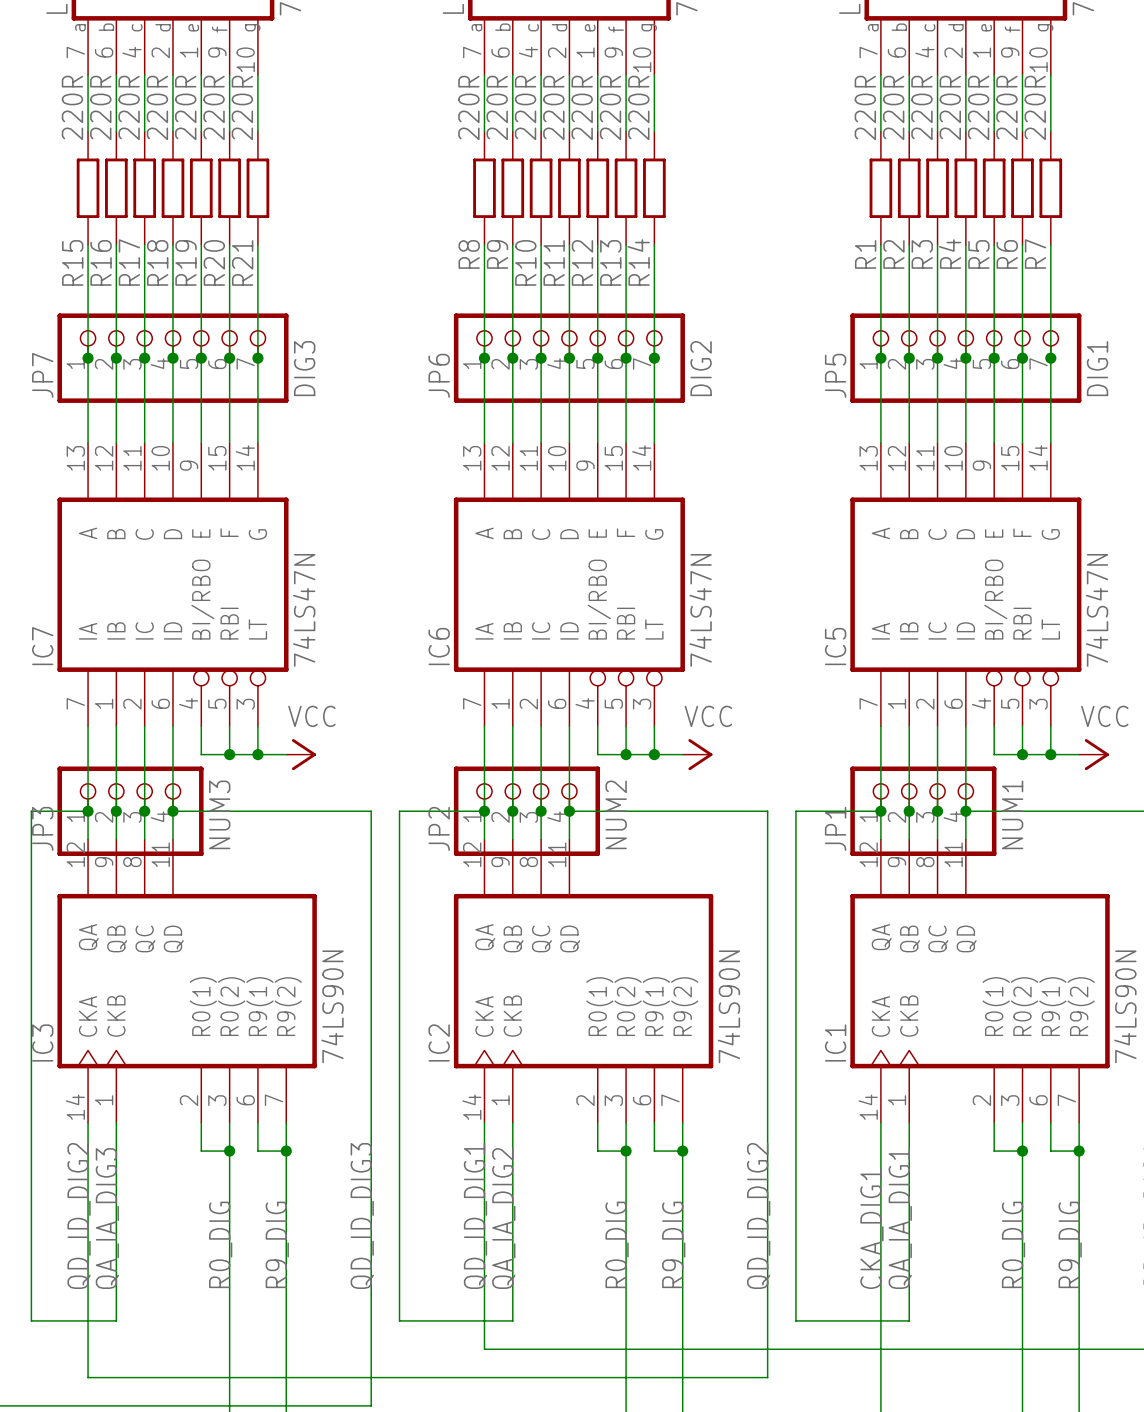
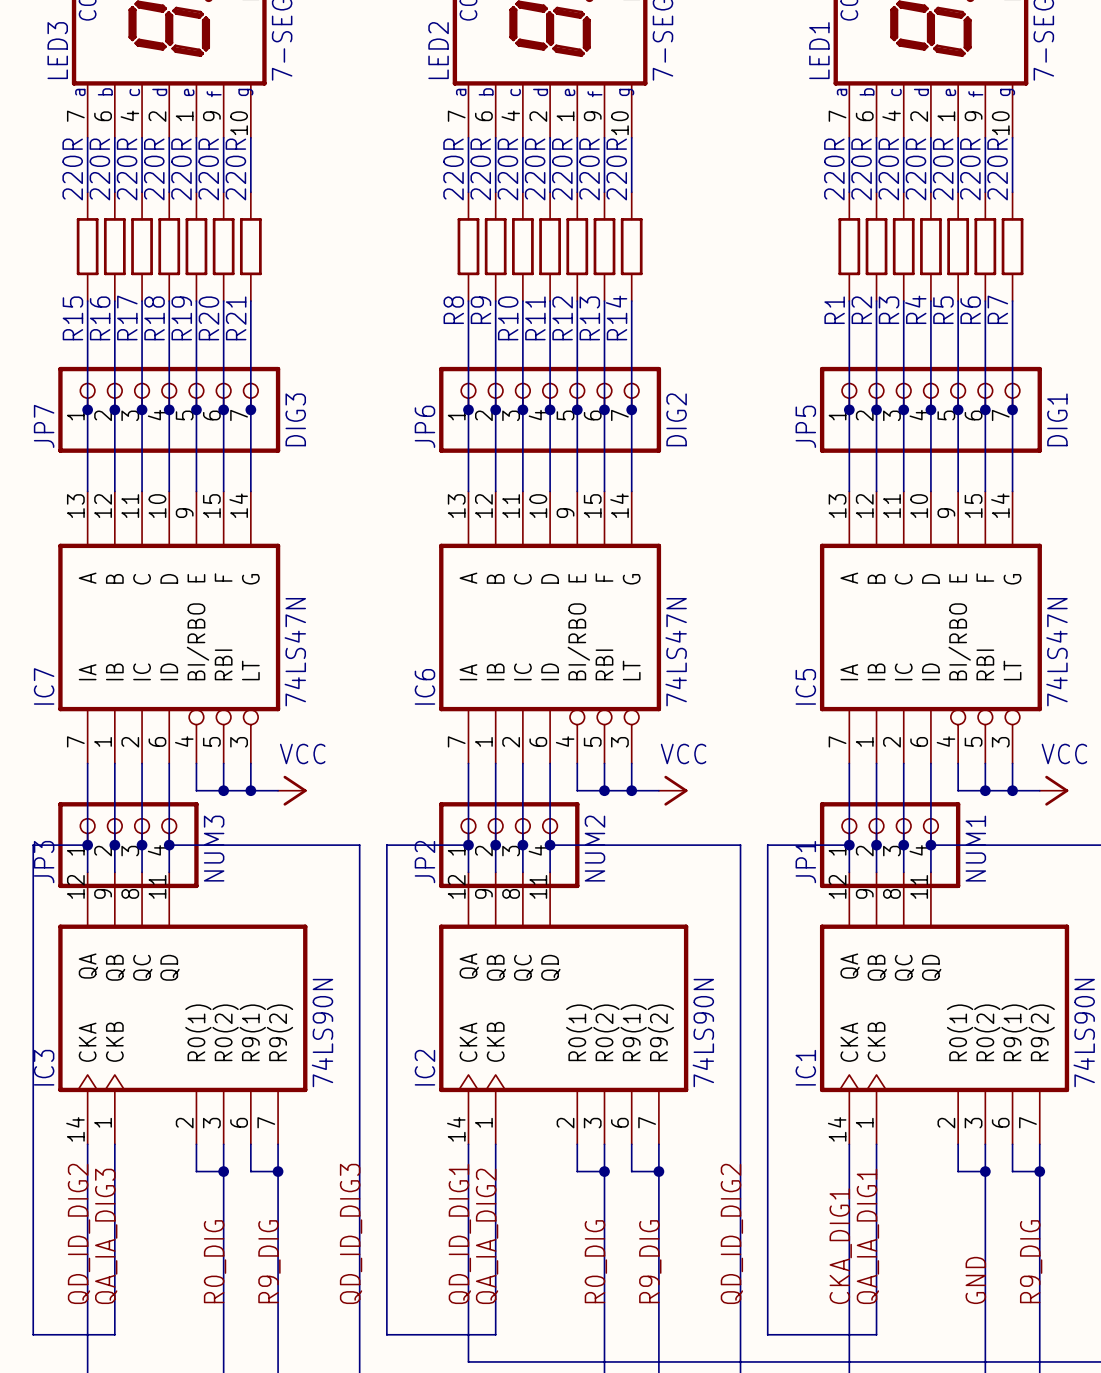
label: R0_DIG (1013, 1244) -> GND (975, 1280)

